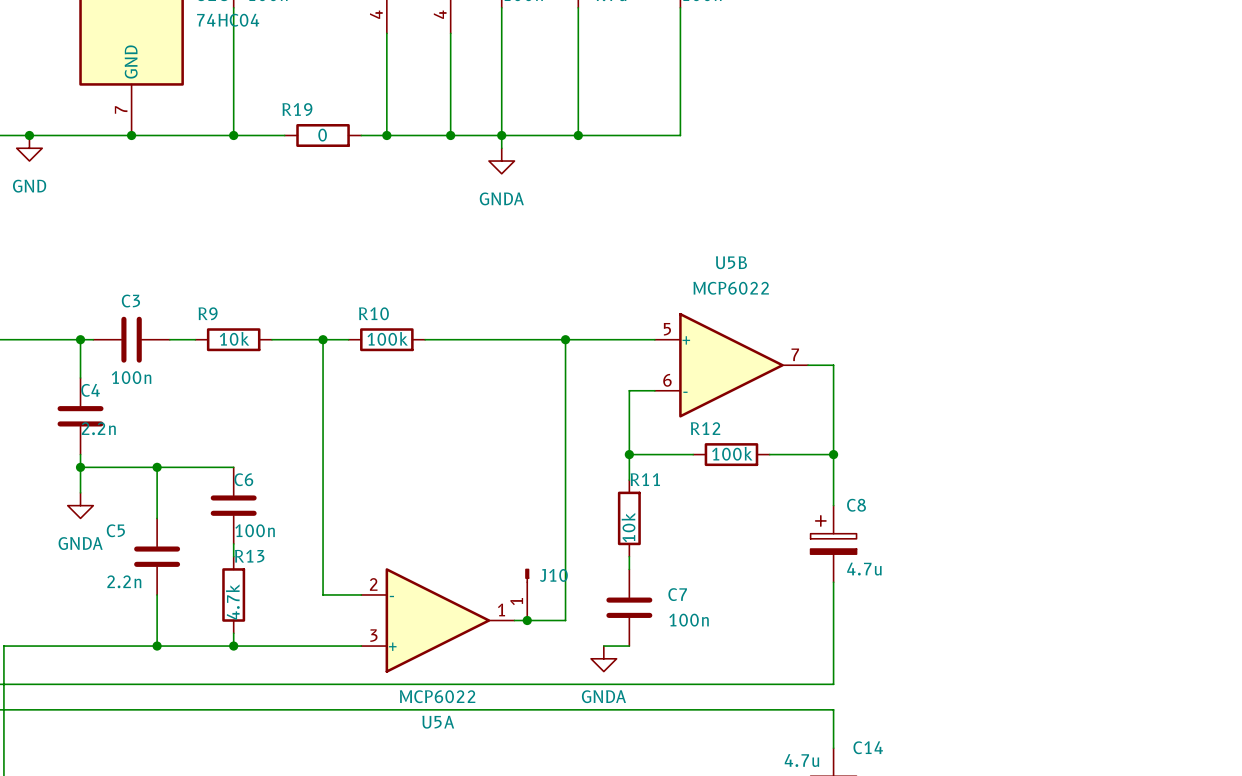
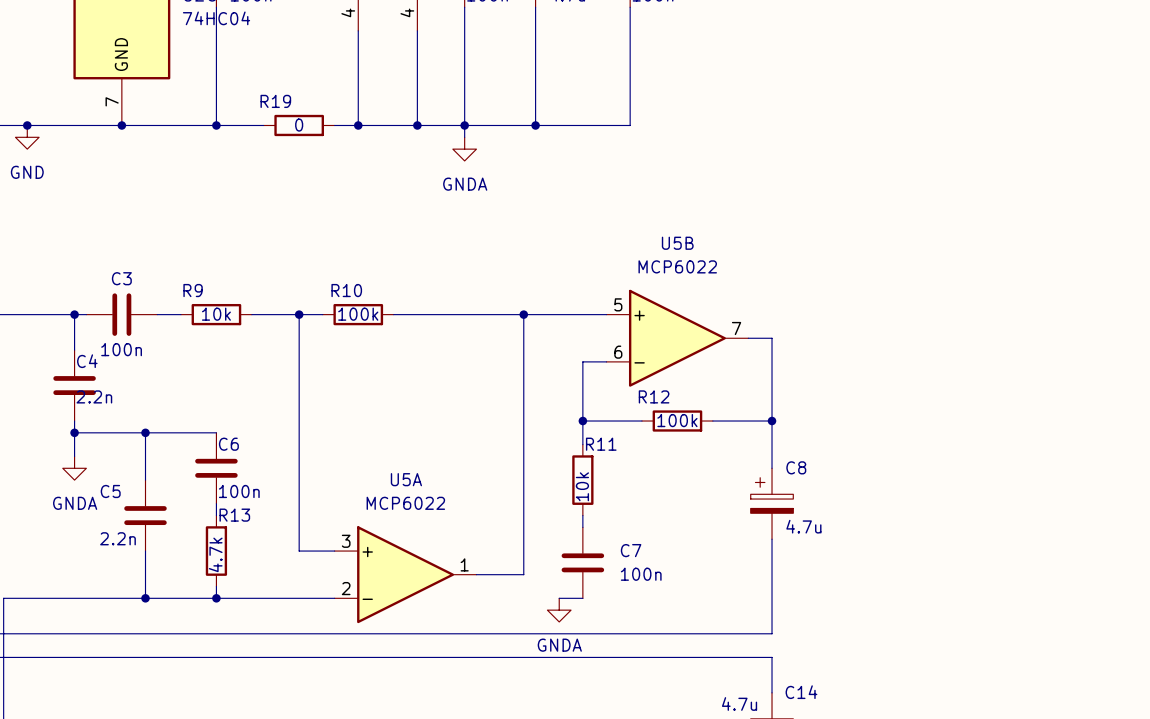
J10: (527, 594) -> none
U5A flip: as is (437, 620) -> up-down (405, 574)
junction: (527, 620) -> none

